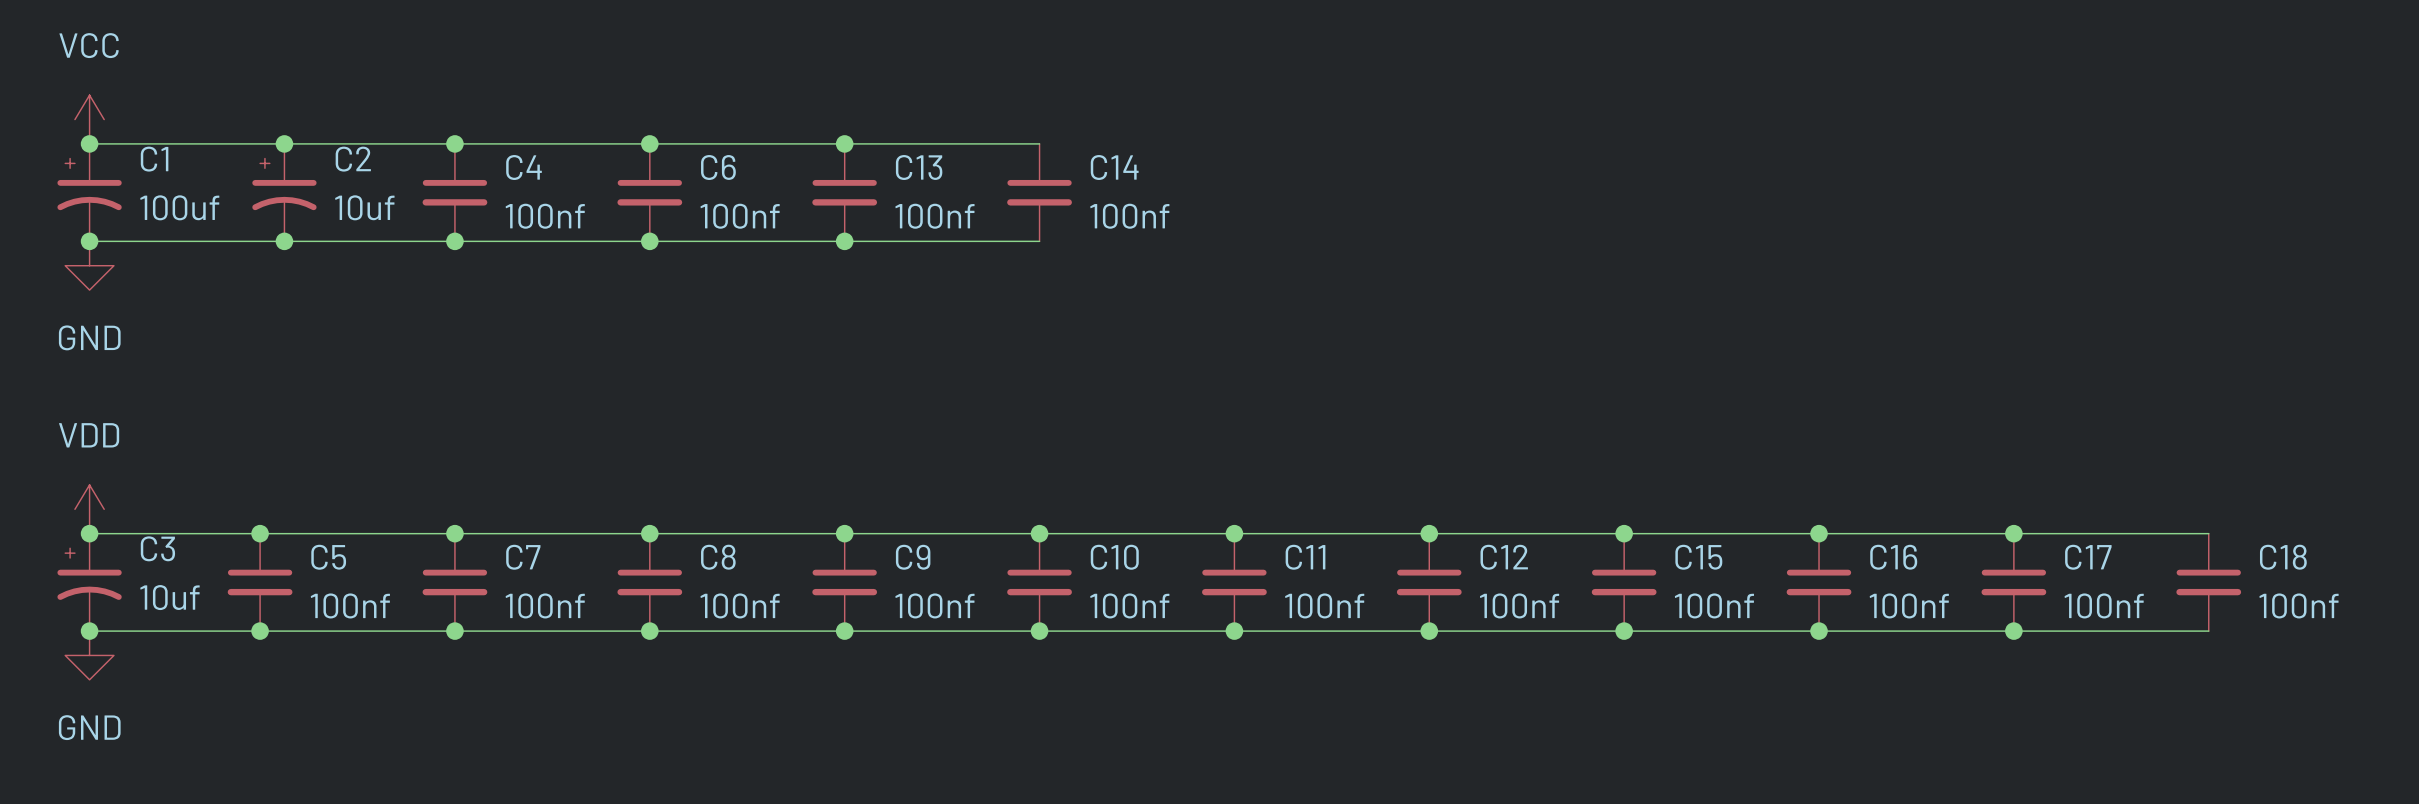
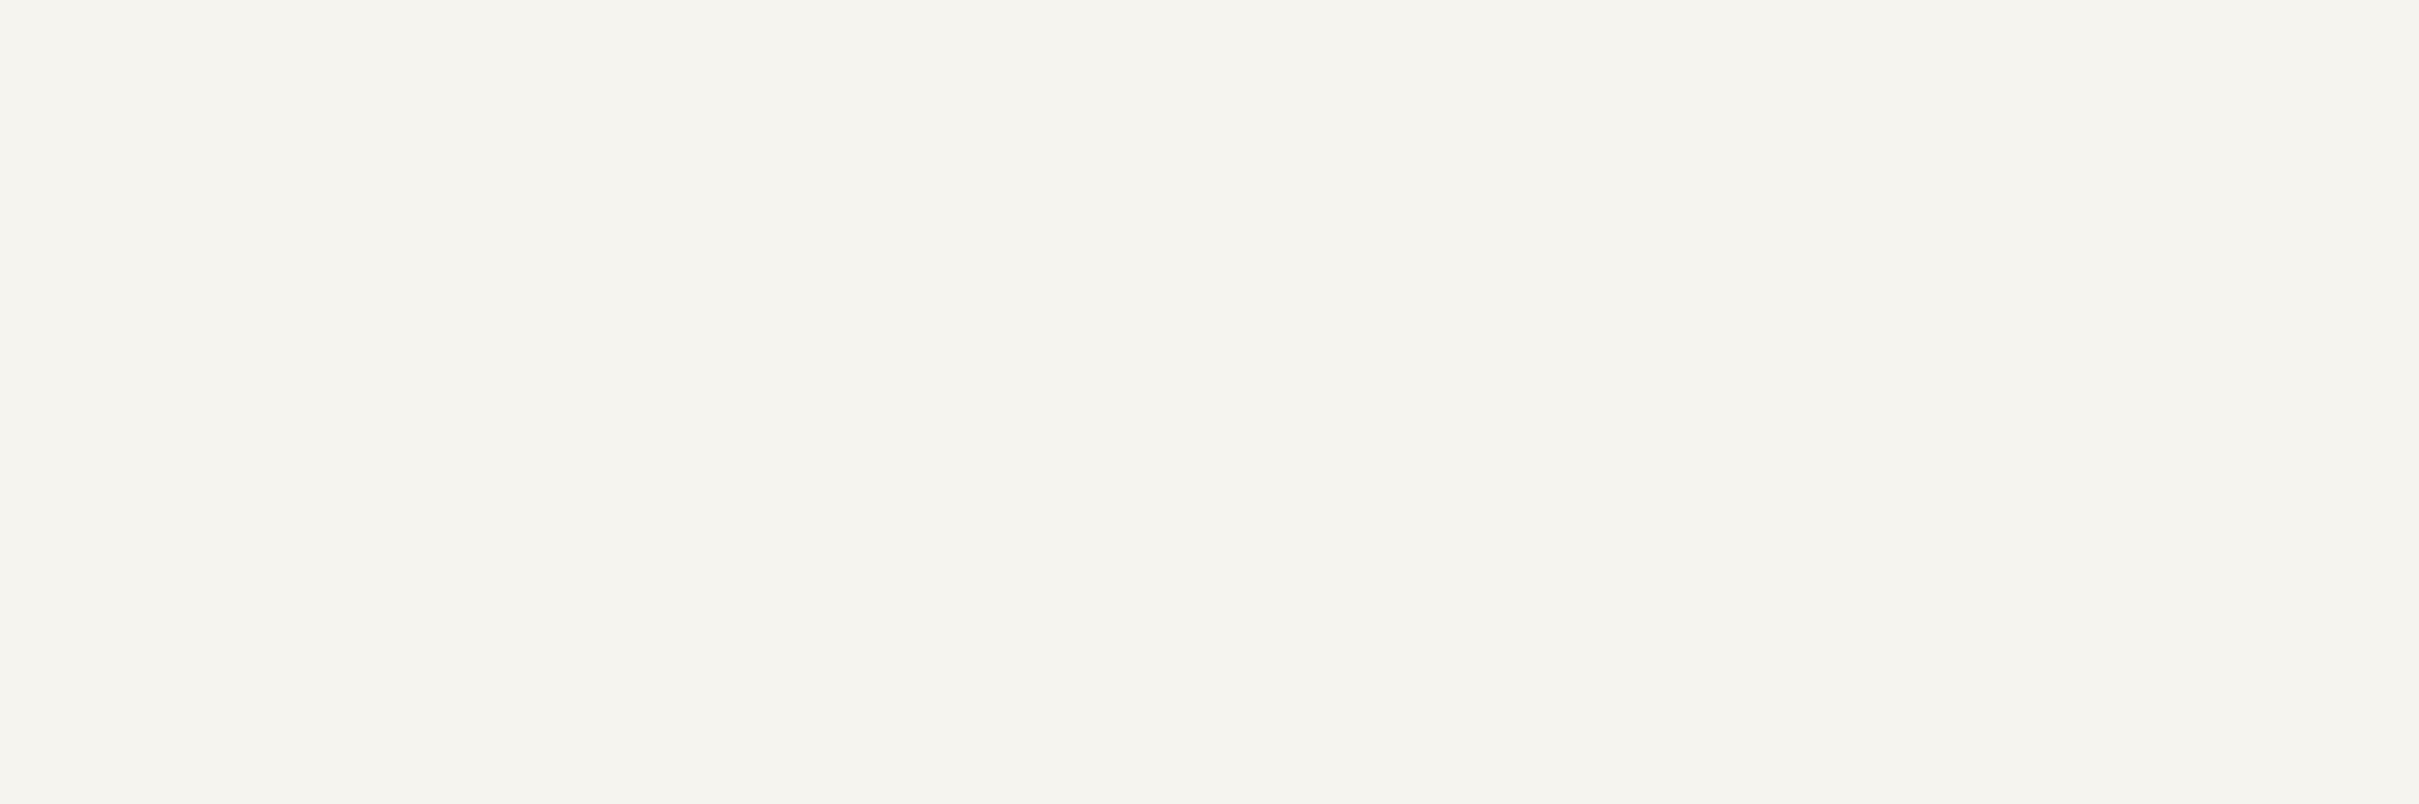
power symbol: VCC (89, 119) -> none
wire: (89, 143) (1039, 143) -> none
junction: (89, 143) -> none
junction: (284, 143) -> none
junction: (454, 143) -> none
junction: (649, 143) -> none
junction: (844, 143) -> none
C1: 100uf (89, 192) -> none
C2: 10uf (284, 192) -> none
C4: 100nf (454, 192) -> none
C6: 100nf (649, 192) -> none
C13: 100nf (844, 192) -> none
C14: 100nf (1039, 192) -> none
wire: (89, 241) (1039, 241) -> none
junction: (89, 241) -> none
junction: (284, 241) -> none
junction: (454, 241) -> none
junction: (649, 241) -> none
junction: (844, 241) -> none
power symbol: GND (89, 265) -> none
power symbol: VDD (89, 509) -> none
wire: (89, 533) (2208, 533) -> none
junction: (89, 533) -> none
junction: (260, 533) -> none
junction: (454, 533) -> none
junction: (649, 533) -> none
junction: (844, 533) -> none
junction: (1039, 533) -> none
junction: (1234, 533) -> none
junction: (1429, 533) -> none
junction: (1624, 533) -> none
junction: (1819, 533) -> none
junction: (2013, 533) -> none
C3: 10uf (89, 582) -> none
C5: 100nf (260, 582) -> none
C7: 100nf (454, 582) -> none
C8: 100nf (649, 582) -> none
C9: 100nf (844, 582) -> none
C10: 100nf (1039, 582) -> none
C11: 100nf (1234, 582) -> none
C12: 100nf (1429, 582) -> none
C15: 100nf (1624, 582) -> none
C16: 100nf (1819, 582) -> none
C17: 100nf (2013, 582) -> none
C18: 100nf (2208, 582) -> none
wire: (89, 631) (2208, 631) -> none
junction: (89, 631) -> none
junction: (260, 631) -> none
junction: (454, 631) -> none
junction: (649, 631) -> none
junction: (844, 631) -> none
junction: (1039, 631) -> none
junction: (1234, 631) -> none
junction: (1429, 631) -> none
junction: (1624, 631) -> none
junction: (1819, 631) -> none
junction: (2013, 631) -> none
power symbol: GND (89, 655) -> none

